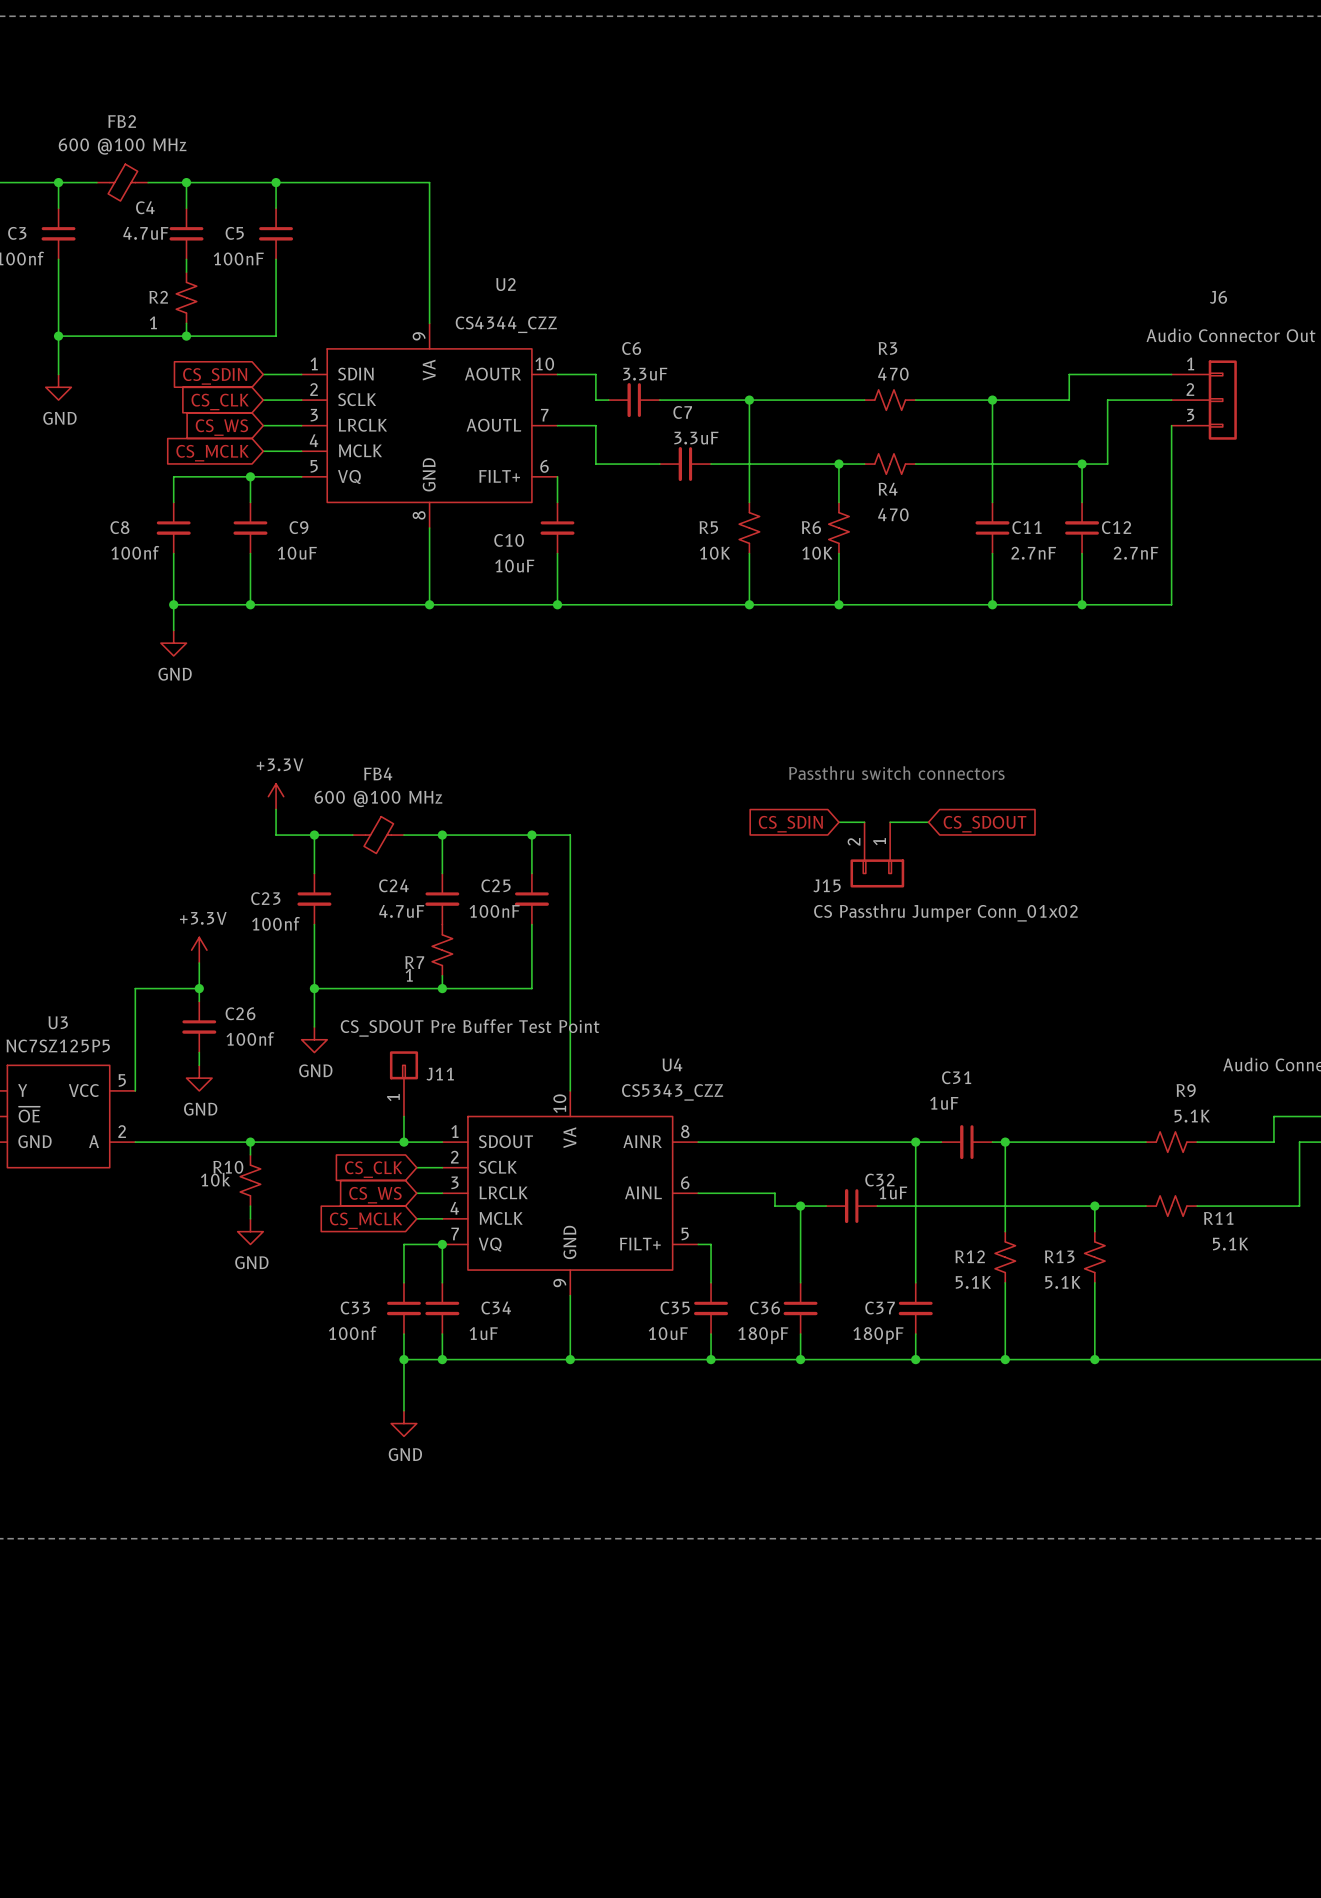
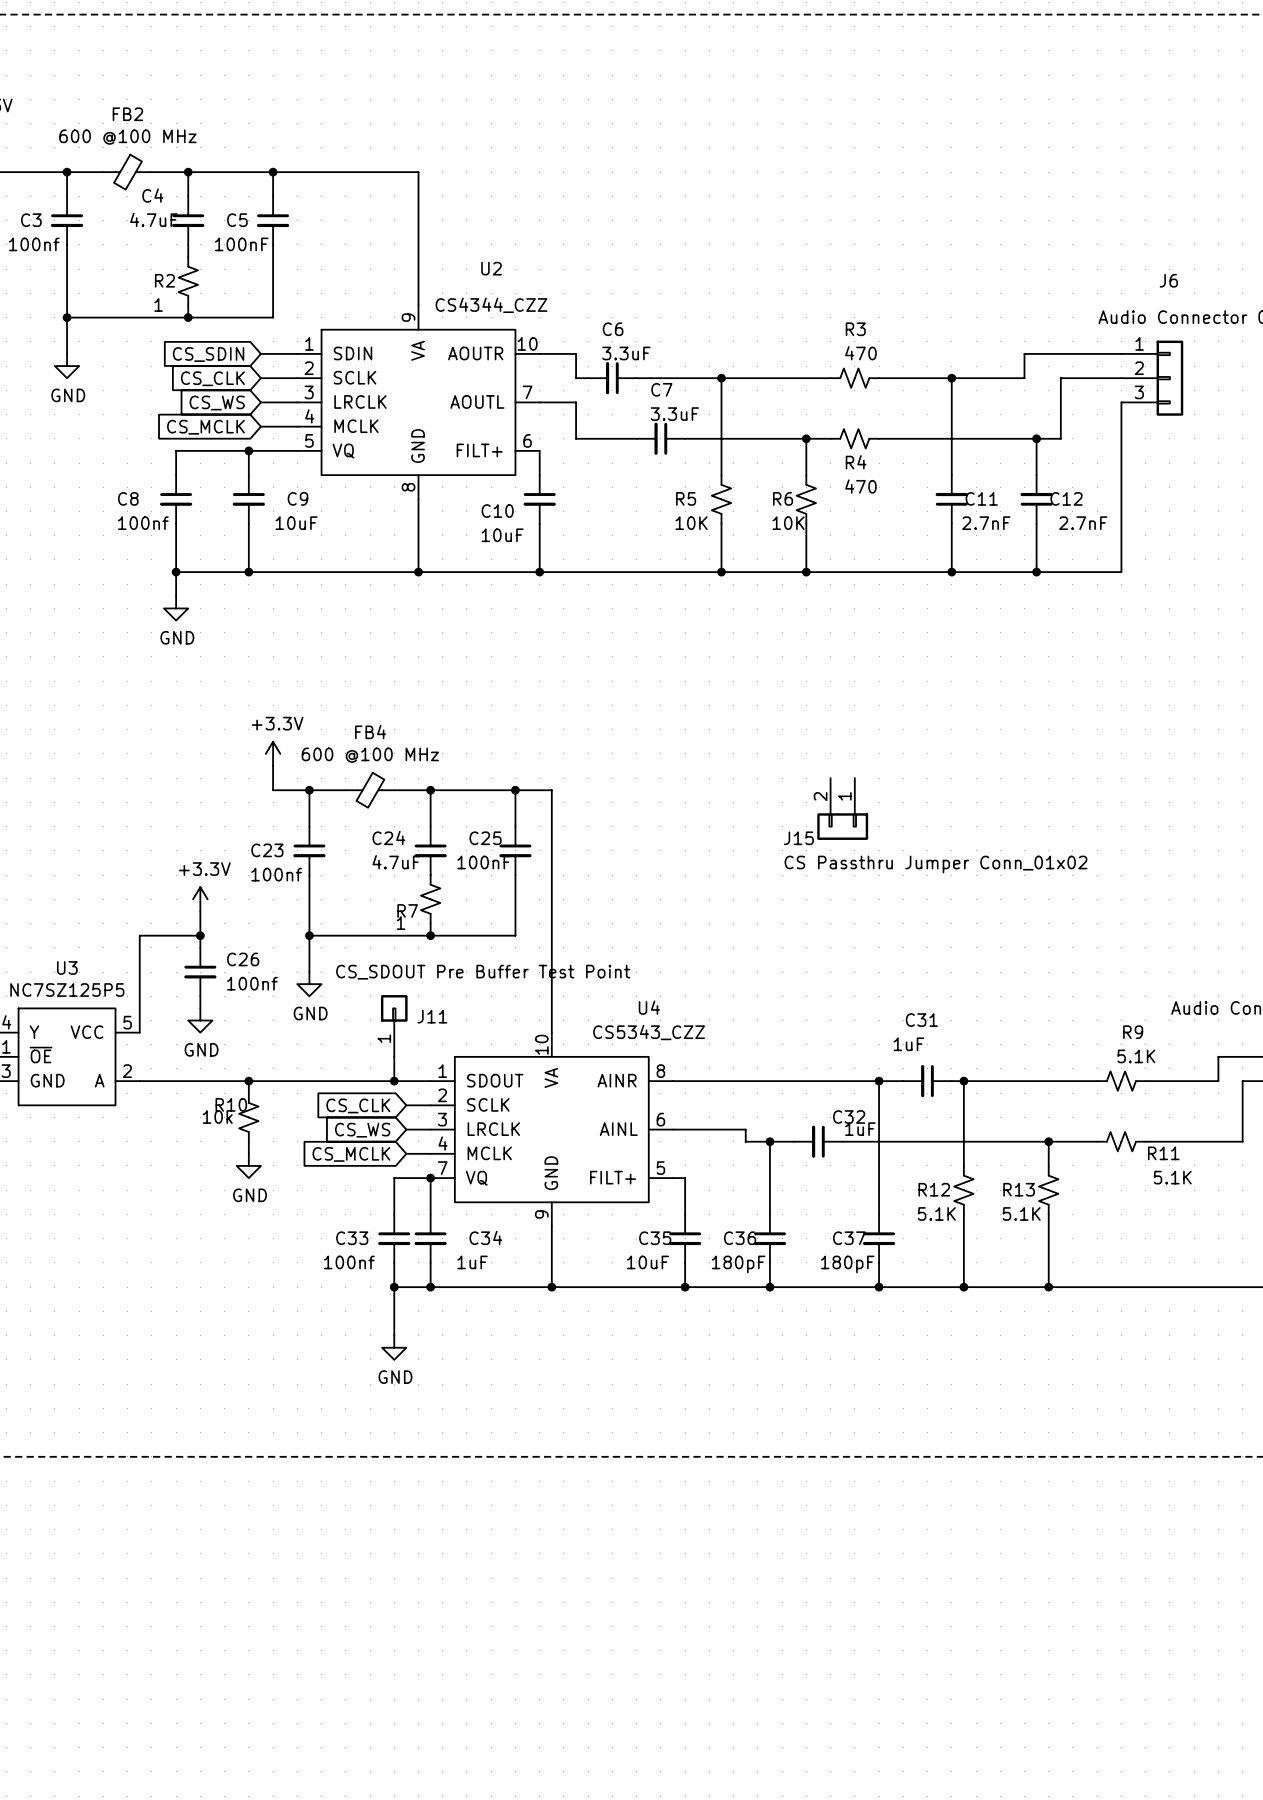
text: Passthru switch connectors (896, 773) -> none
wire: (838, 822) (864, 822) -> none
wire: (890, 822) (928, 822) -> none
global label: CS_SDIN (790, 824) -> none
global label: CS_SDOUT (985, 824) -> none

